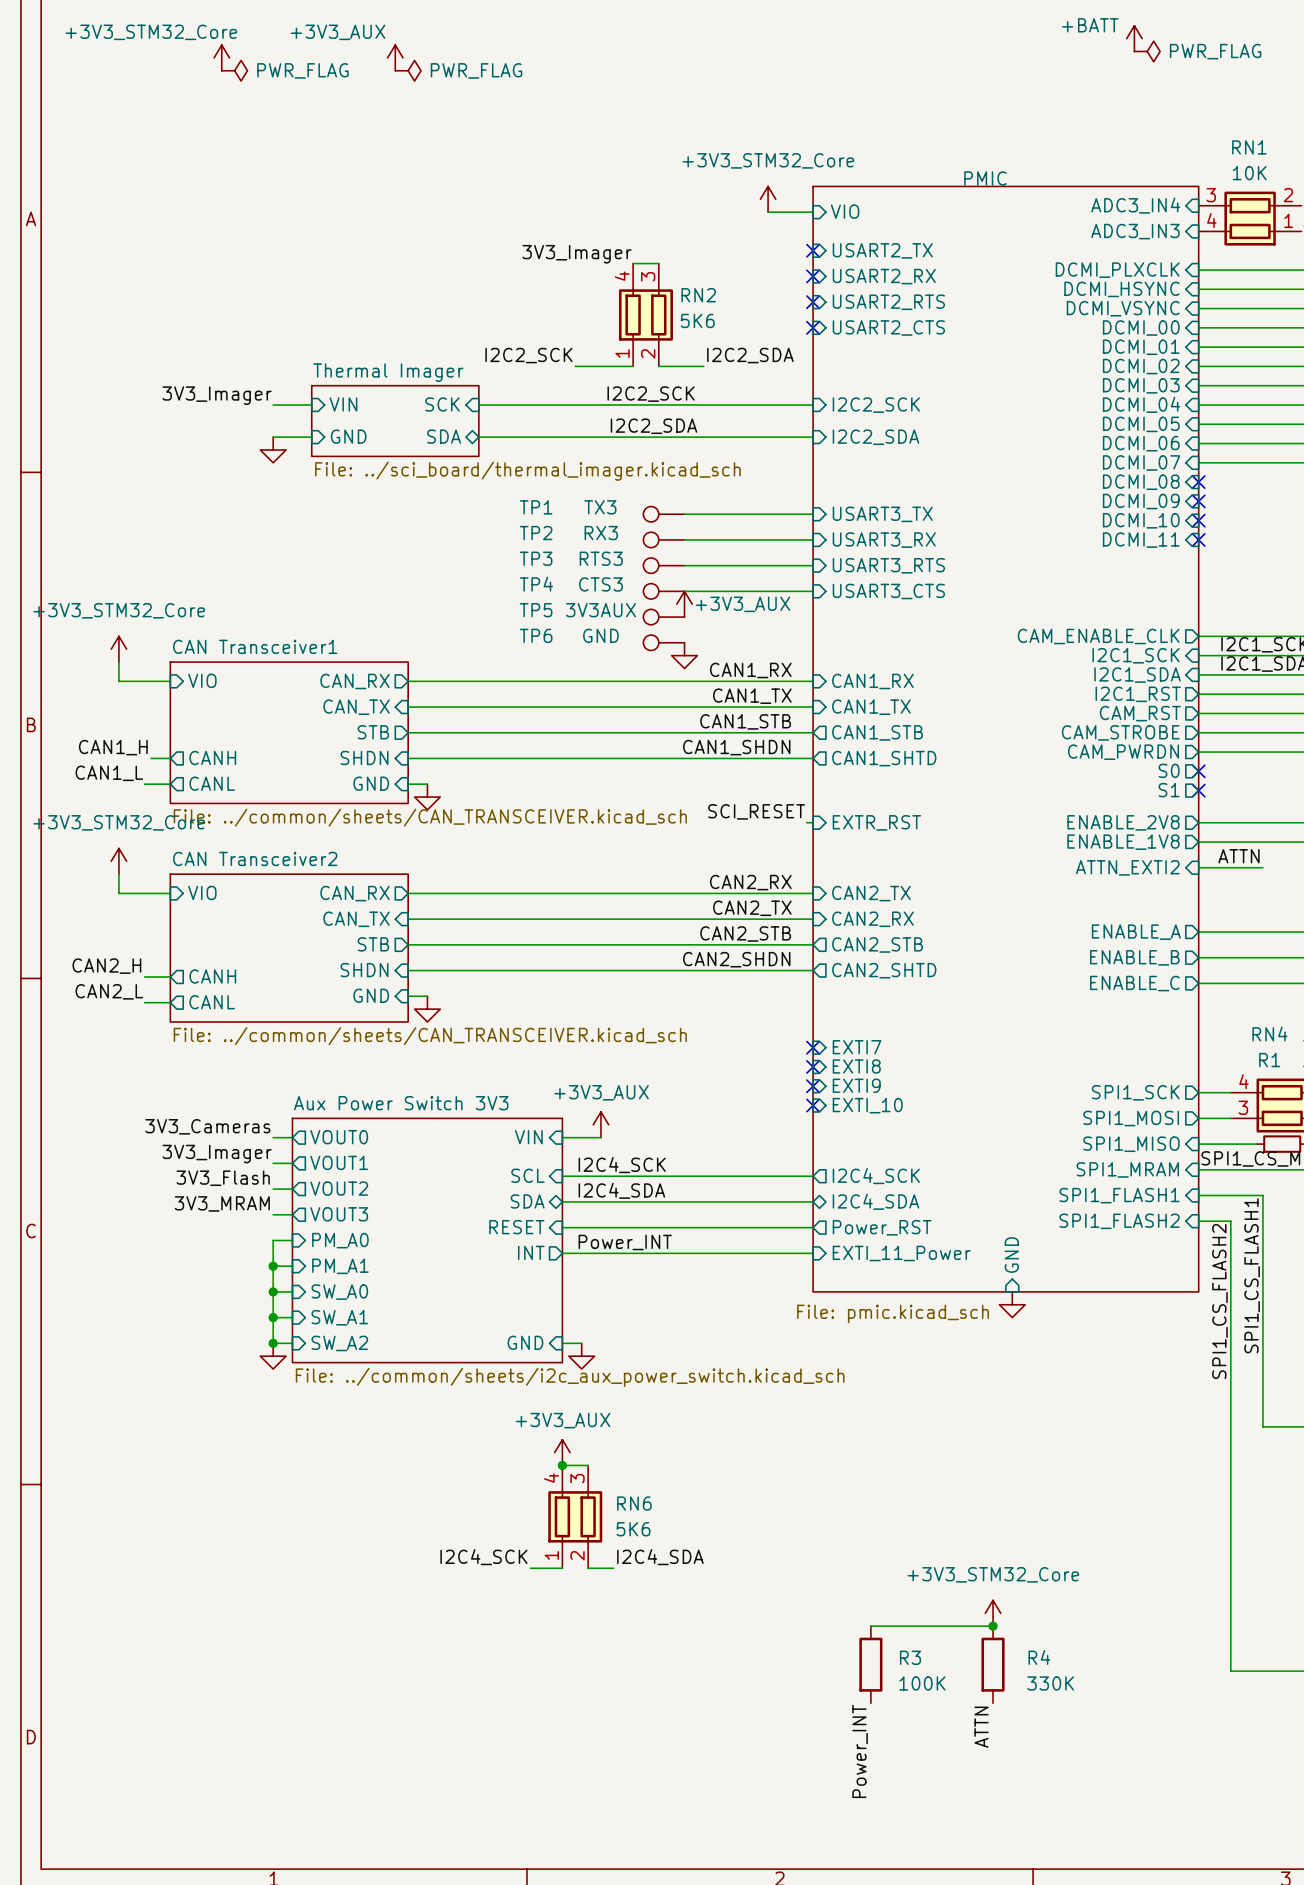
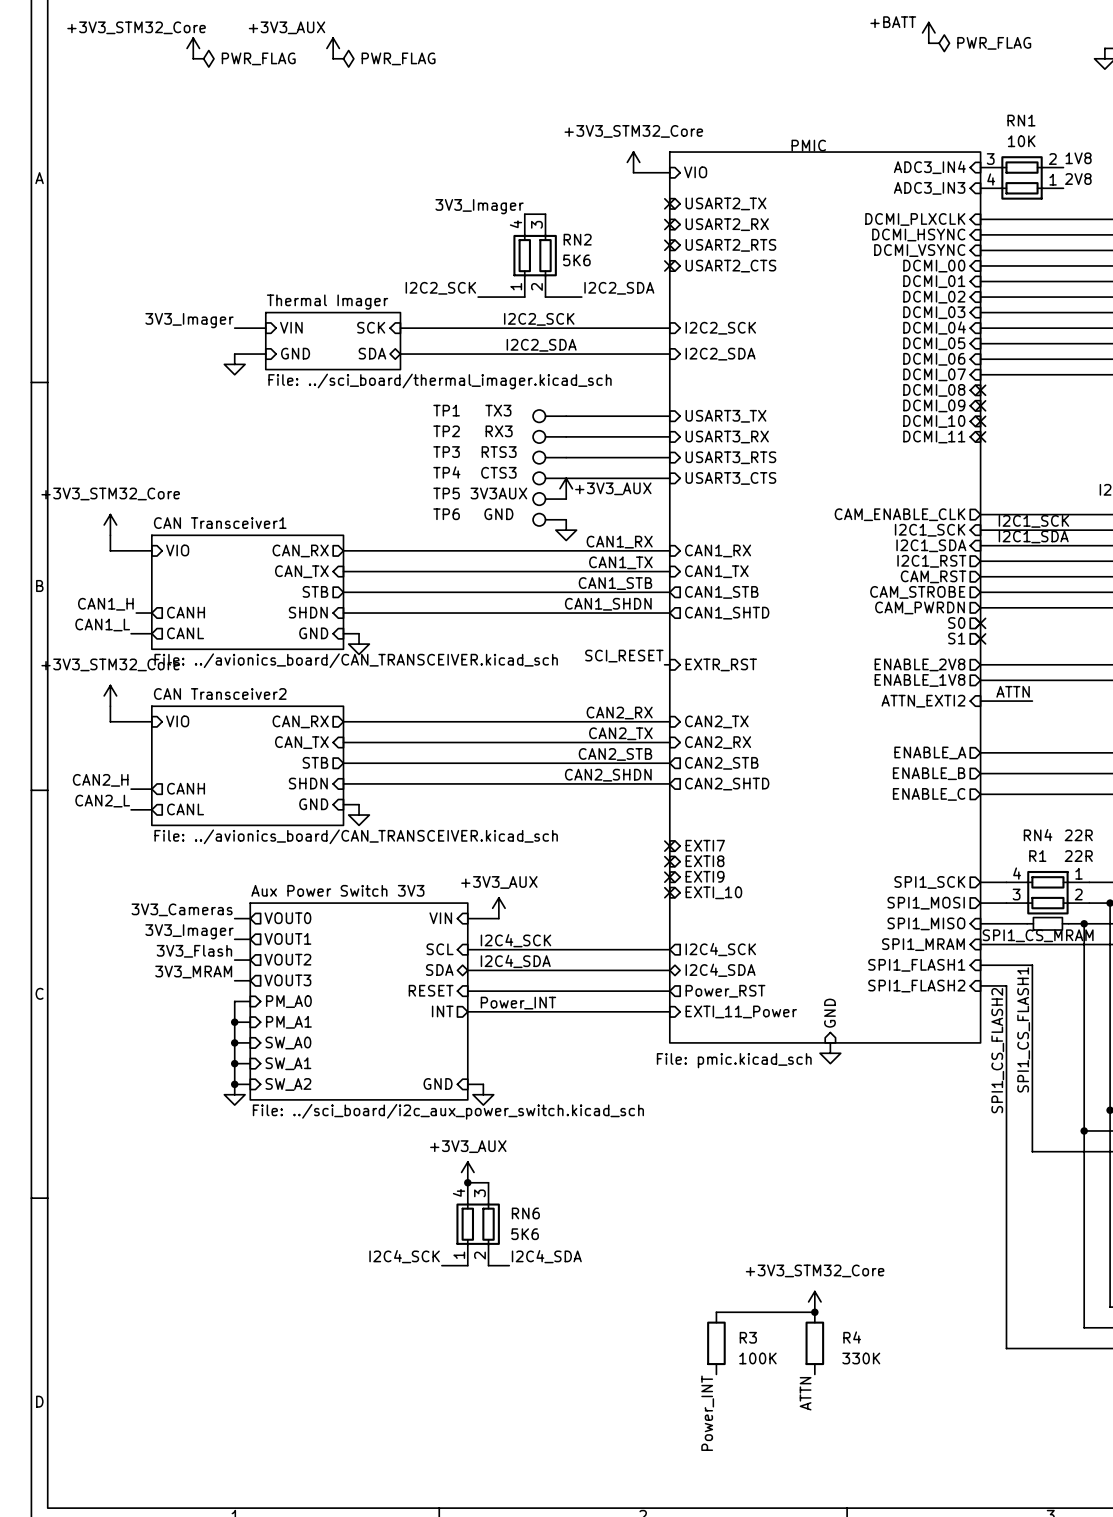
sheet CAN Transceiver1 value: File: ../common/sheets/CAN_TRANSCEIVER.kicad_sch (430, 817) -> File: ../avionics_board/CAN_TRANSCEIVER.kicad_sch (356, 660)
sheet CAN Transceiver2 value: File: ../common/sheets/CAN_TRANSCEIVER.kicad_sch (430, 1036) -> File: ../avionics_board/CAN_TRANSCEIVER.kicad_sch (356, 836)
sheet Aux Power Switch 3V3 value: File: ../common/sheets/i2c_aux_power_switch.kicad_sch (570, 1377) -> File: ../sci_board/i2c_aux_power_switch.kicad_sch (448, 1111)

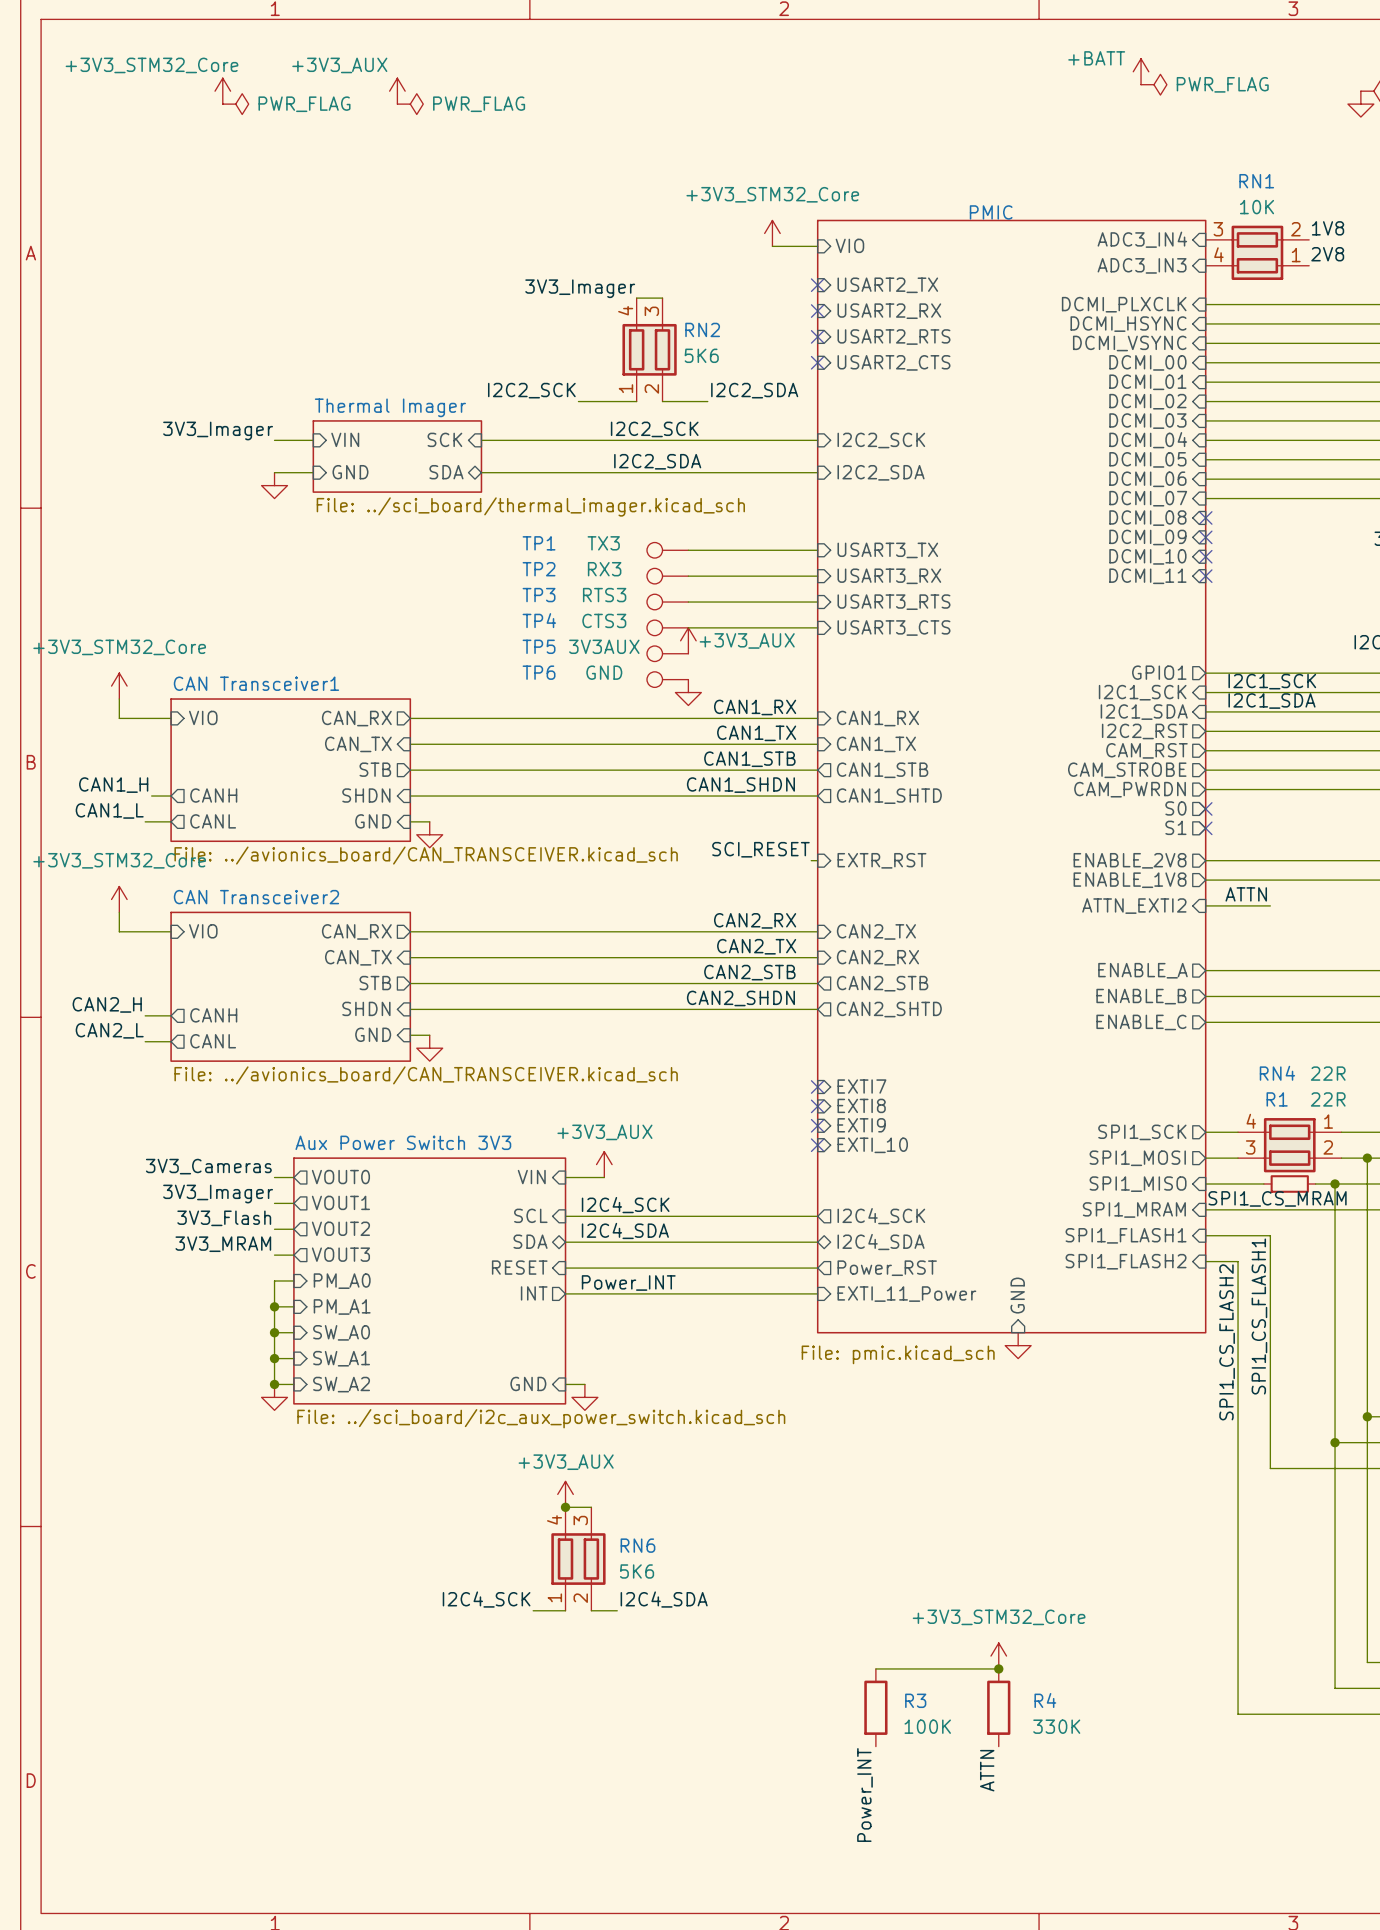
sheet pin: CAM_ENABLE_CLK (900, 514) -> GPIO1 (1159, 672)
sheet pin: I2C1_RST (931, 561) -> I2C2_RST (1144, 731)

